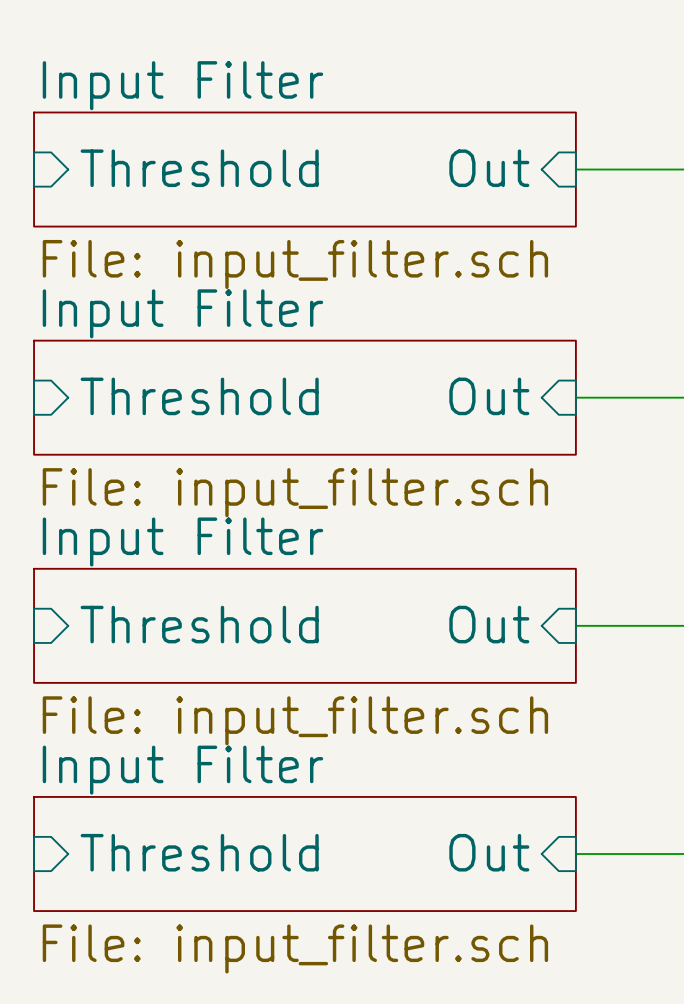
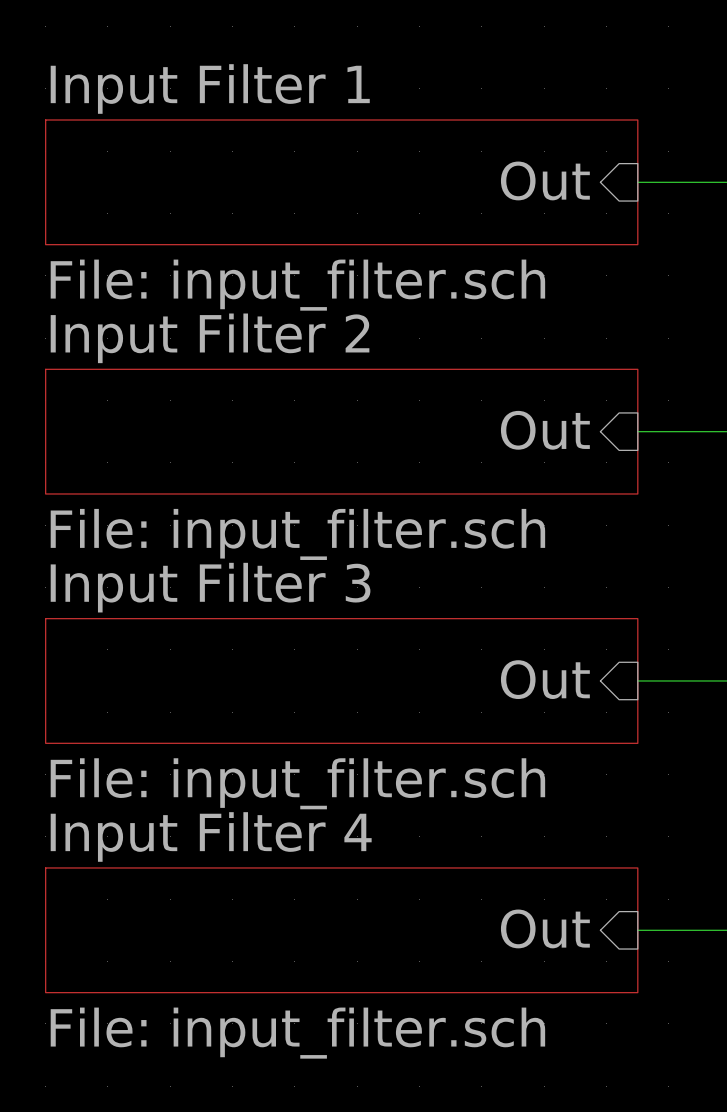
sheet Input Filter name: Input Filter (182, 85) -> Input Filter 1 (210, 88)
sheet pin: Threshold (199, 168) -> none
sheet Input Filter name: Input Filter (182, 313) -> Input Filter 2 (210, 338)
sheet pin: Threshold (199, 396) -> none
sheet Input Filter name: Input Filter (182, 541) -> Input Filter 3 (210, 587)
sheet pin: Threshold (199, 624) -> none
sheet Input Filter name: Input Filter (182, 770) -> Input Filter 4 (211, 836)
sheet pin: Threshold (199, 852) -> none

